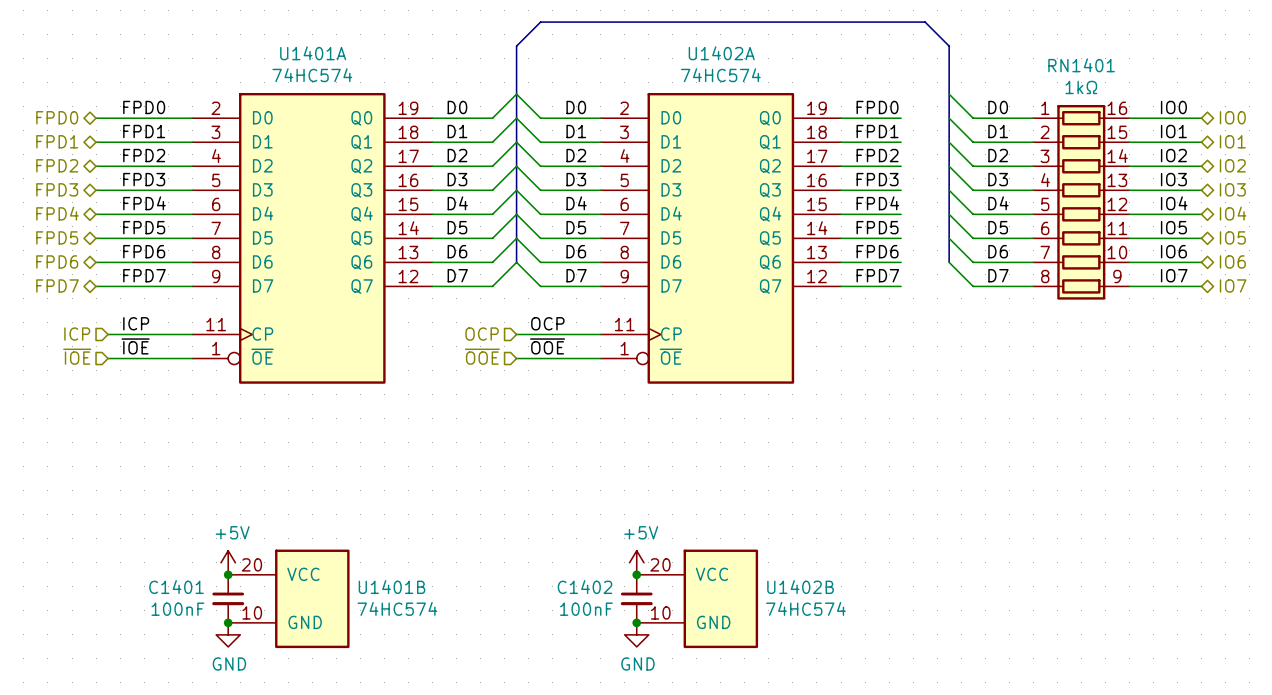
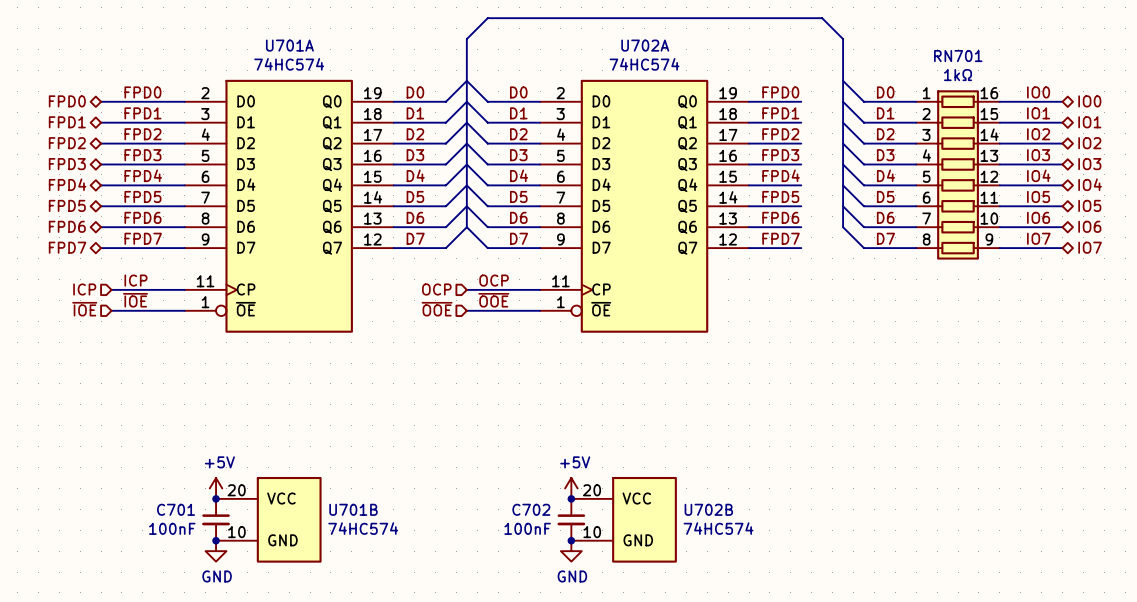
U1401A name: U1401A (313, 53) -> U701A (289, 45)
U1402A name: U1402A (721, 53) -> U702A (645, 45)
RN1401 name: RN1401 (1081, 65) -> RN701 (958, 56)
C1401 name: C1401 (176, 587) -> C701 (176, 509)
U1401B name: U1401B (391, 587) -> U701B (353, 509)
C1402 name: C1402 (585, 587) -> C702 (531, 509)
U1402B name: U1402B (800, 587) -> U702B (708, 509)

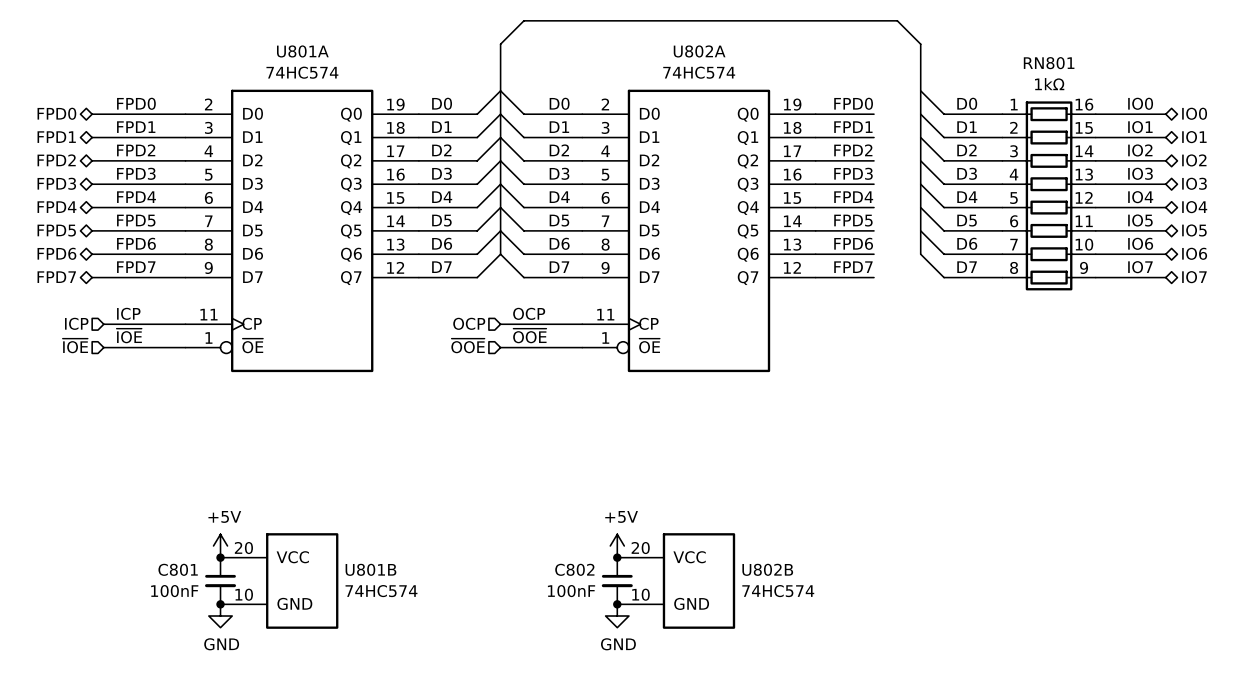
U701A name: U701A (289, 45) -> U801A (302, 51)
U702A name: U702A (645, 45) -> U802A (699, 51)
RN701 name: RN701 (958, 56) -> RN801 (1049, 63)
C701 name: C701 (176, 509) -> C801 (178, 569)
U701B name: U701B (353, 509) -> U801B (370, 569)
C702 name: C702 (531, 509) -> C802 (574, 569)
U702B name: U702B (708, 509) -> U802B (767, 569)

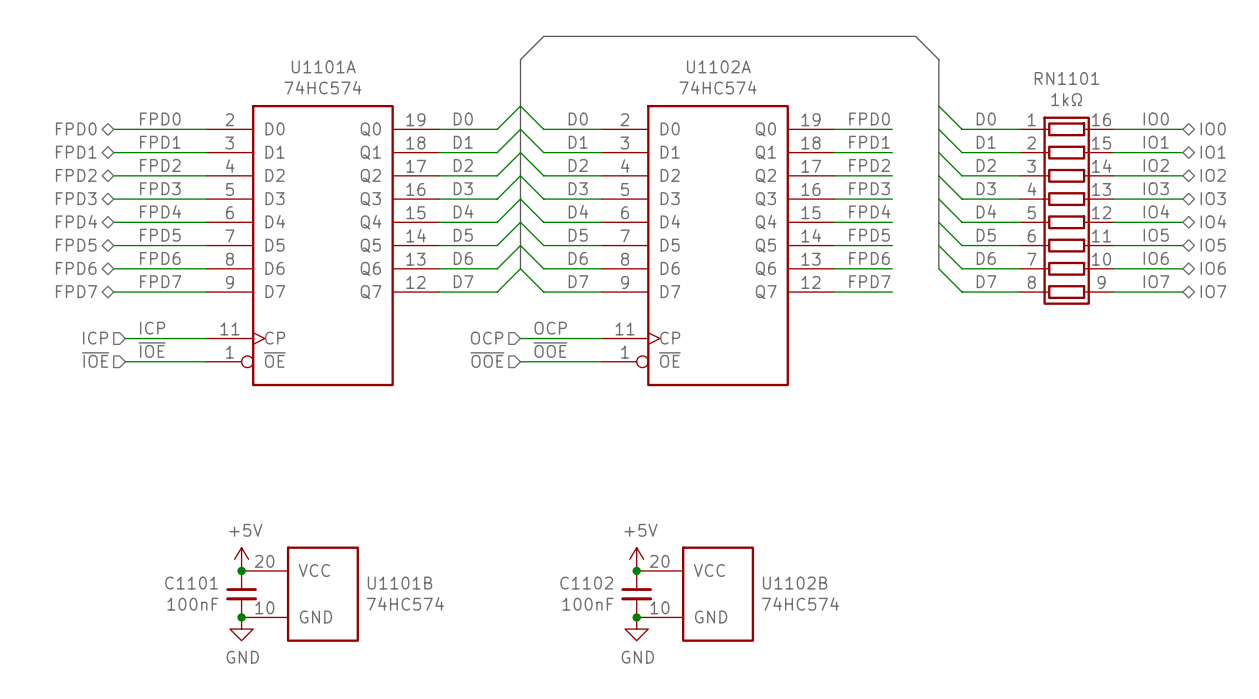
U801A name: U801A (302, 51) -> U1101A (323, 66)
U802A name: U802A (699, 51) -> U1102A (718, 66)
RN801 name: RN801 (1049, 63) -> RN1101 (1066, 78)
C801 name: C801 (178, 569) -> C1101 (191, 583)
U801B name: U801B (370, 569) -> U1101B (399, 583)
C802 name: C802 (574, 569) -> C1102 (586, 583)
U802B name: U802B (767, 569) -> U1102B (795, 583)

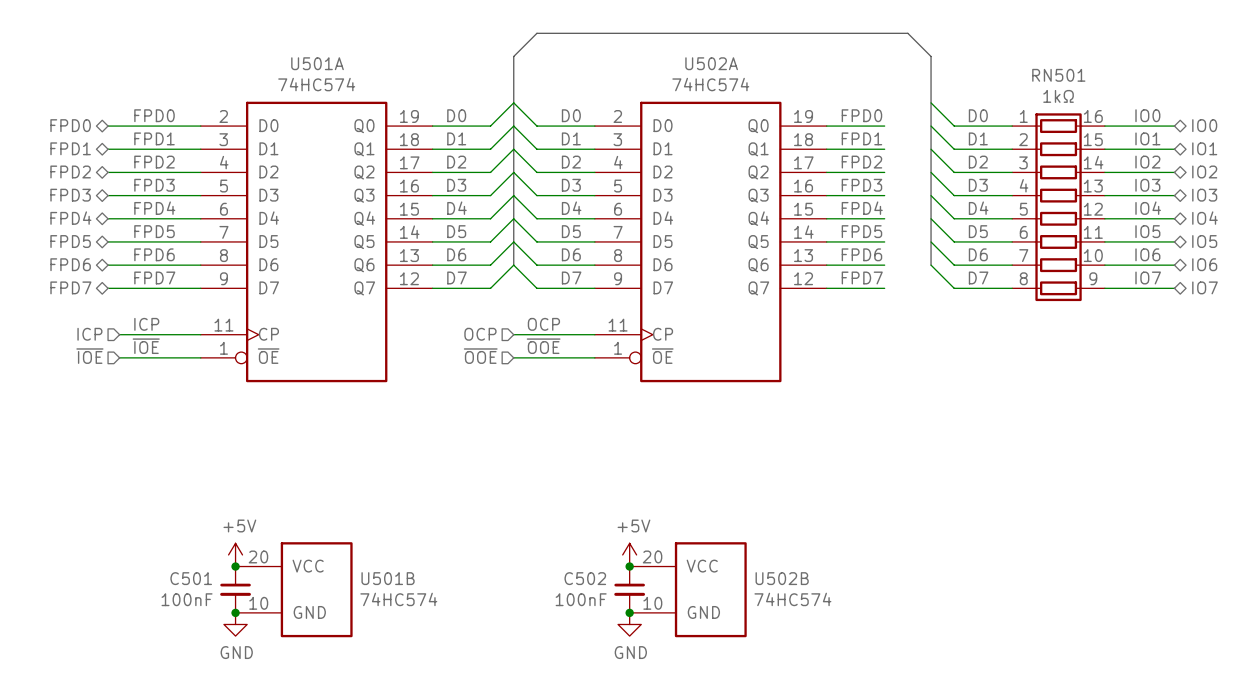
U1101A name: U1101A (323, 66) -> U501A (317, 63)
U1102A name: U1102A (718, 66) -> U502A (711, 63)
RN1101 name: RN1101 (1066, 78) -> RN501 (1058, 75)
C1101 name: C1101 (191, 583) -> C501 (191, 578)
U1101B name: U1101B (399, 583) -> U501B (388, 578)
C1102 name: C1102 (586, 583) -> C502 (585, 578)
U1102B name: U1102B (795, 583) -> U502B (782, 578)

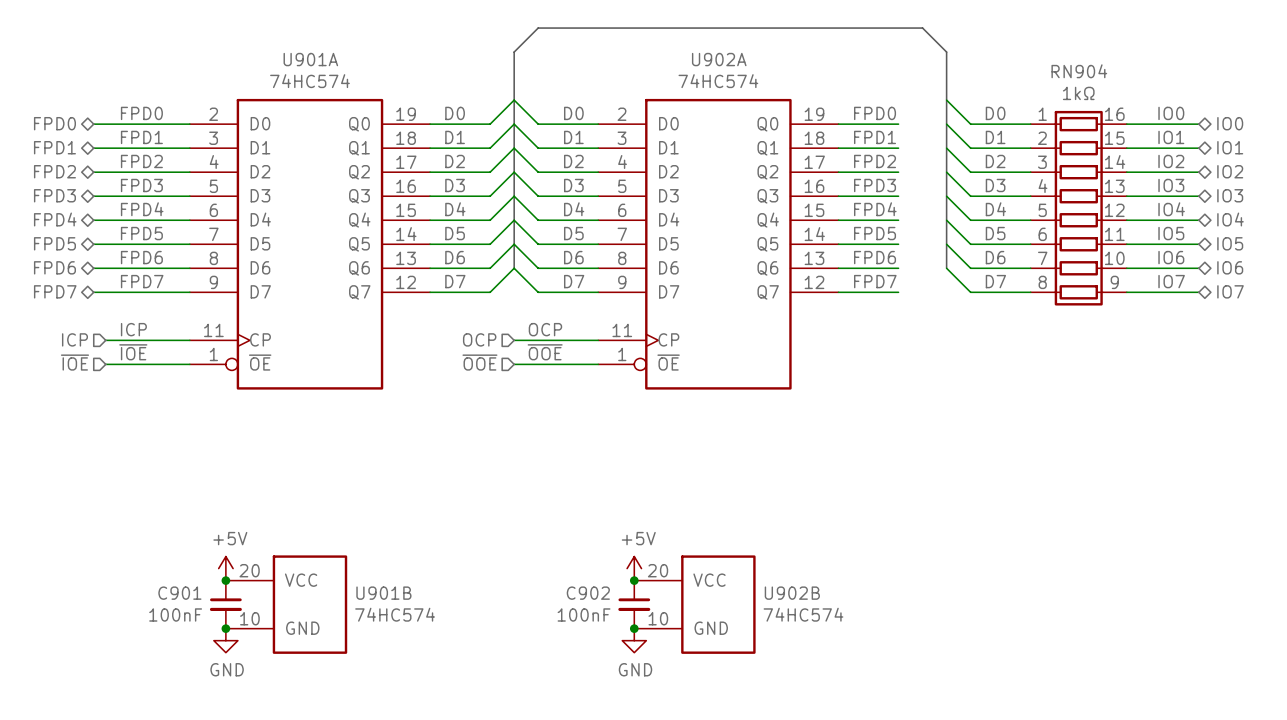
U501A name: U501A (317, 63) -> U901A (310, 59)
U502A name: U502A (711, 63) -> U902A (719, 59)
RN501 name: RN501 (1058, 75) -> RN904 (1079, 71)
C501 name: C501 (191, 578) -> C901 (179, 593)
U501B name: U501B (388, 578) -> U901B (383, 593)
C502 name: C502 (585, 578) -> C902 (588, 593)
U502B name: U502B (782, 578) -> U902B (792, 593)

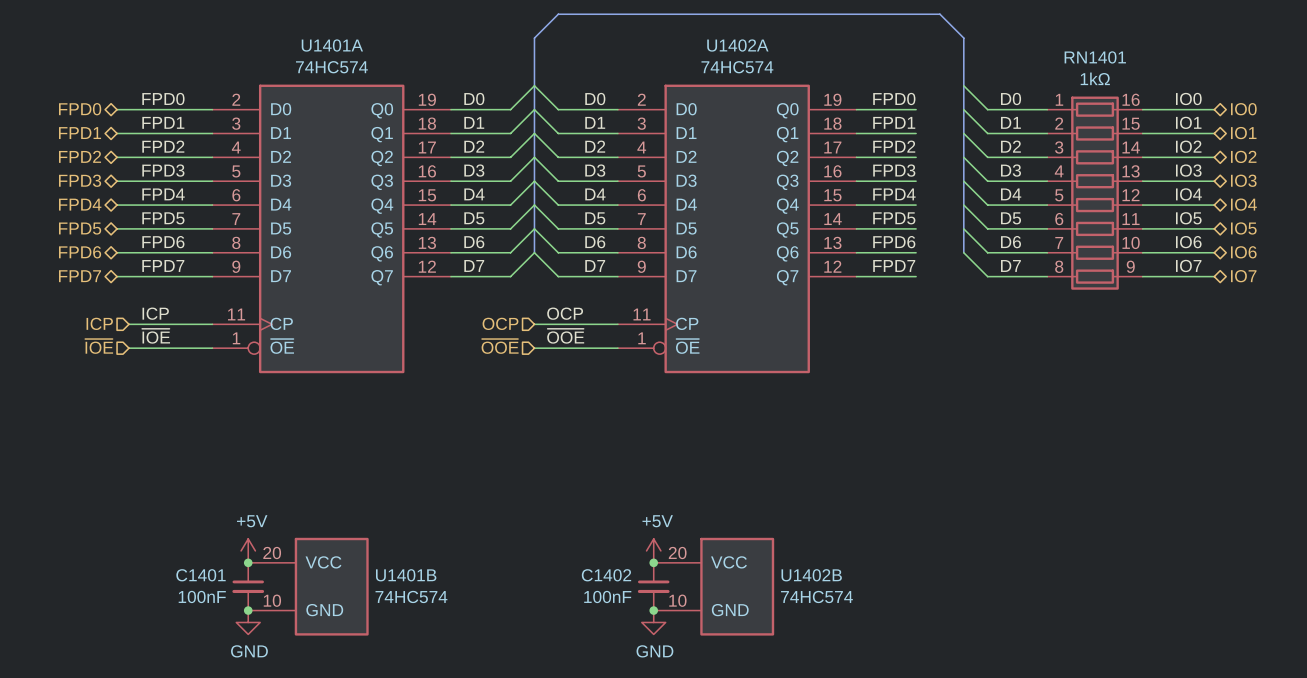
U901A name: U901A (310, 59) -> U1401A (332, 45)
U902A name: U902A (719, 59) -> U1402A (737, 45)
RN904 name: RN904 (1079, 71) -> RN1401 (1095, 57)
C901 name: C901 (179, 593) -> C1401 (201, 575)
U901B name: U901B (383, 593) -> U1401B (406, 575)
C902 name: C902 (588, 593) -> C1402 (606, 575)
U902B name: U902B (792, 593) -> U1402B (811, 575)

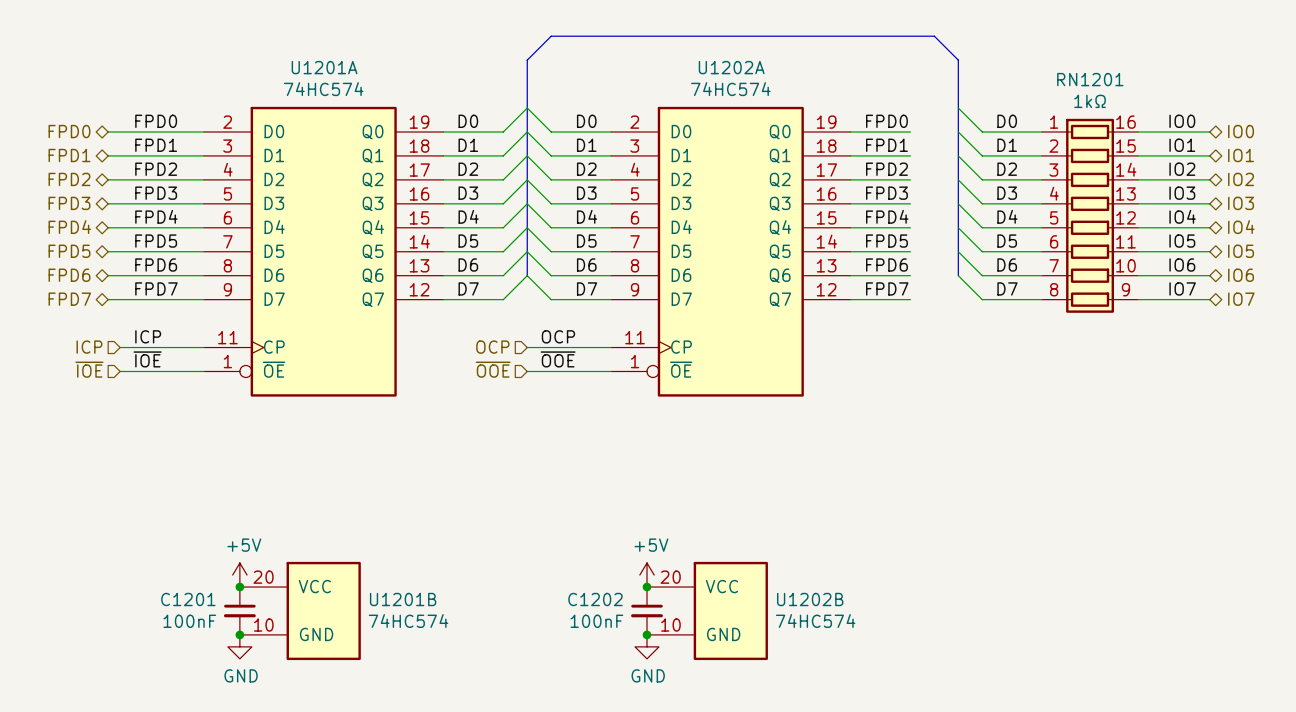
U1401A name: U1401A (332, 45) -> U1201A (324, 67)
U1402A name: U1402A (737, 45) -> U1202A (731, 67)
RN1401 name: RN1401 (1095, 57) -> RN1201 (1090, 79)
C1401 name: C1401 (201, 575) -> C1201 (188, 599)
U1401B name: U1401B (406, 575) -> U1201B (403, 599)
C1402 name: C1402 (606, 575) -> C1202 (595, 599)
U1402B name: U1402B (811, 575) -> U1202B (810, 599)

